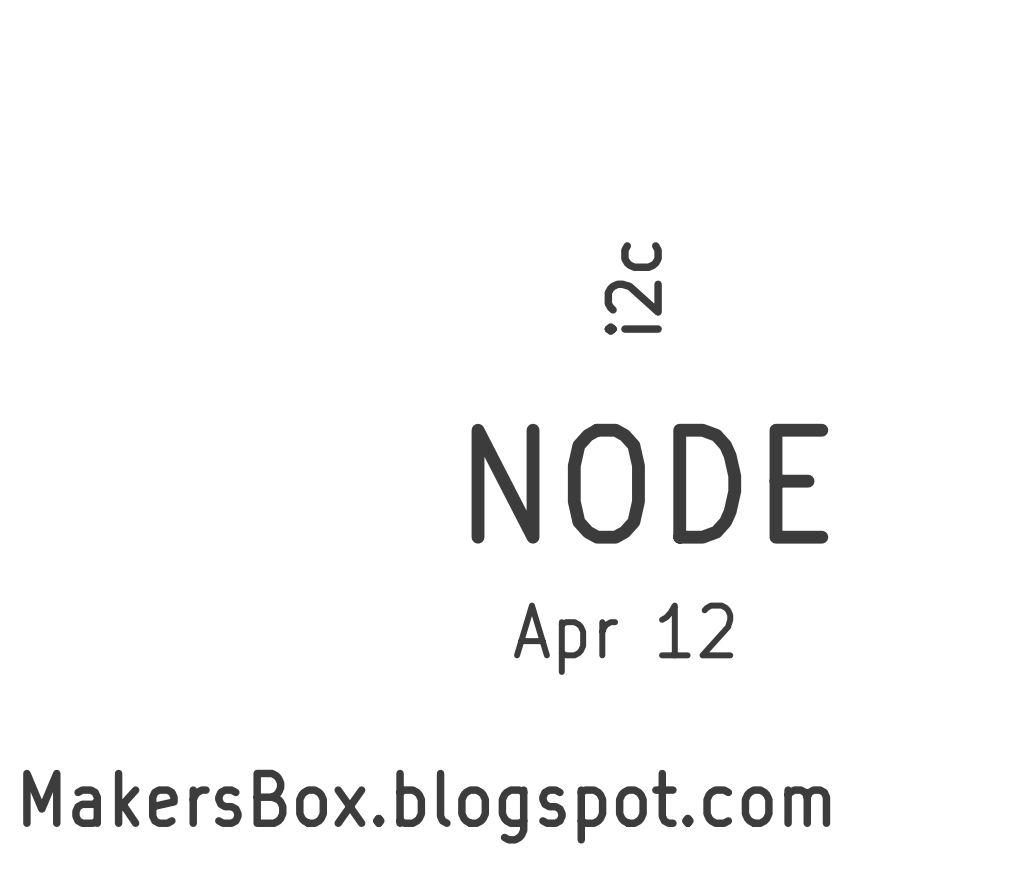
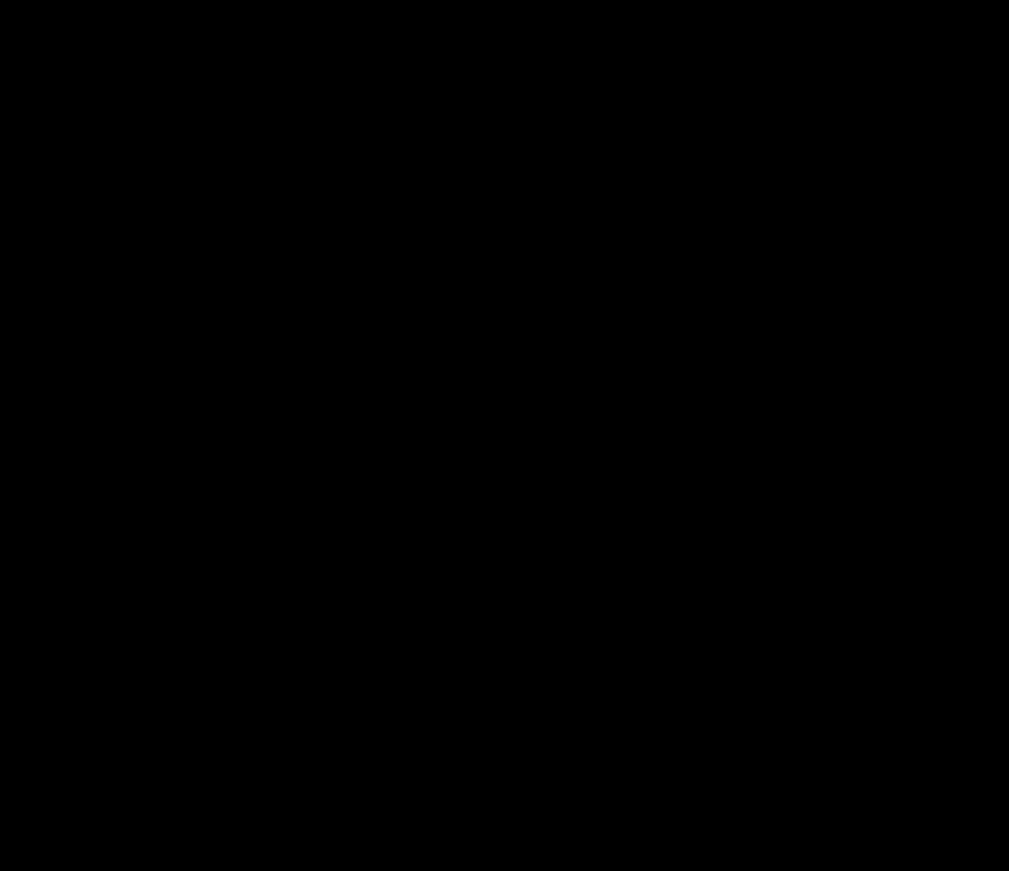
text: i2c (633, 288) -> none
text: NODE (649, 483) -> none
text: Apr 12 (623, 638) -> none
text: MakersBox.blogspot.com (426, 806) -> none

